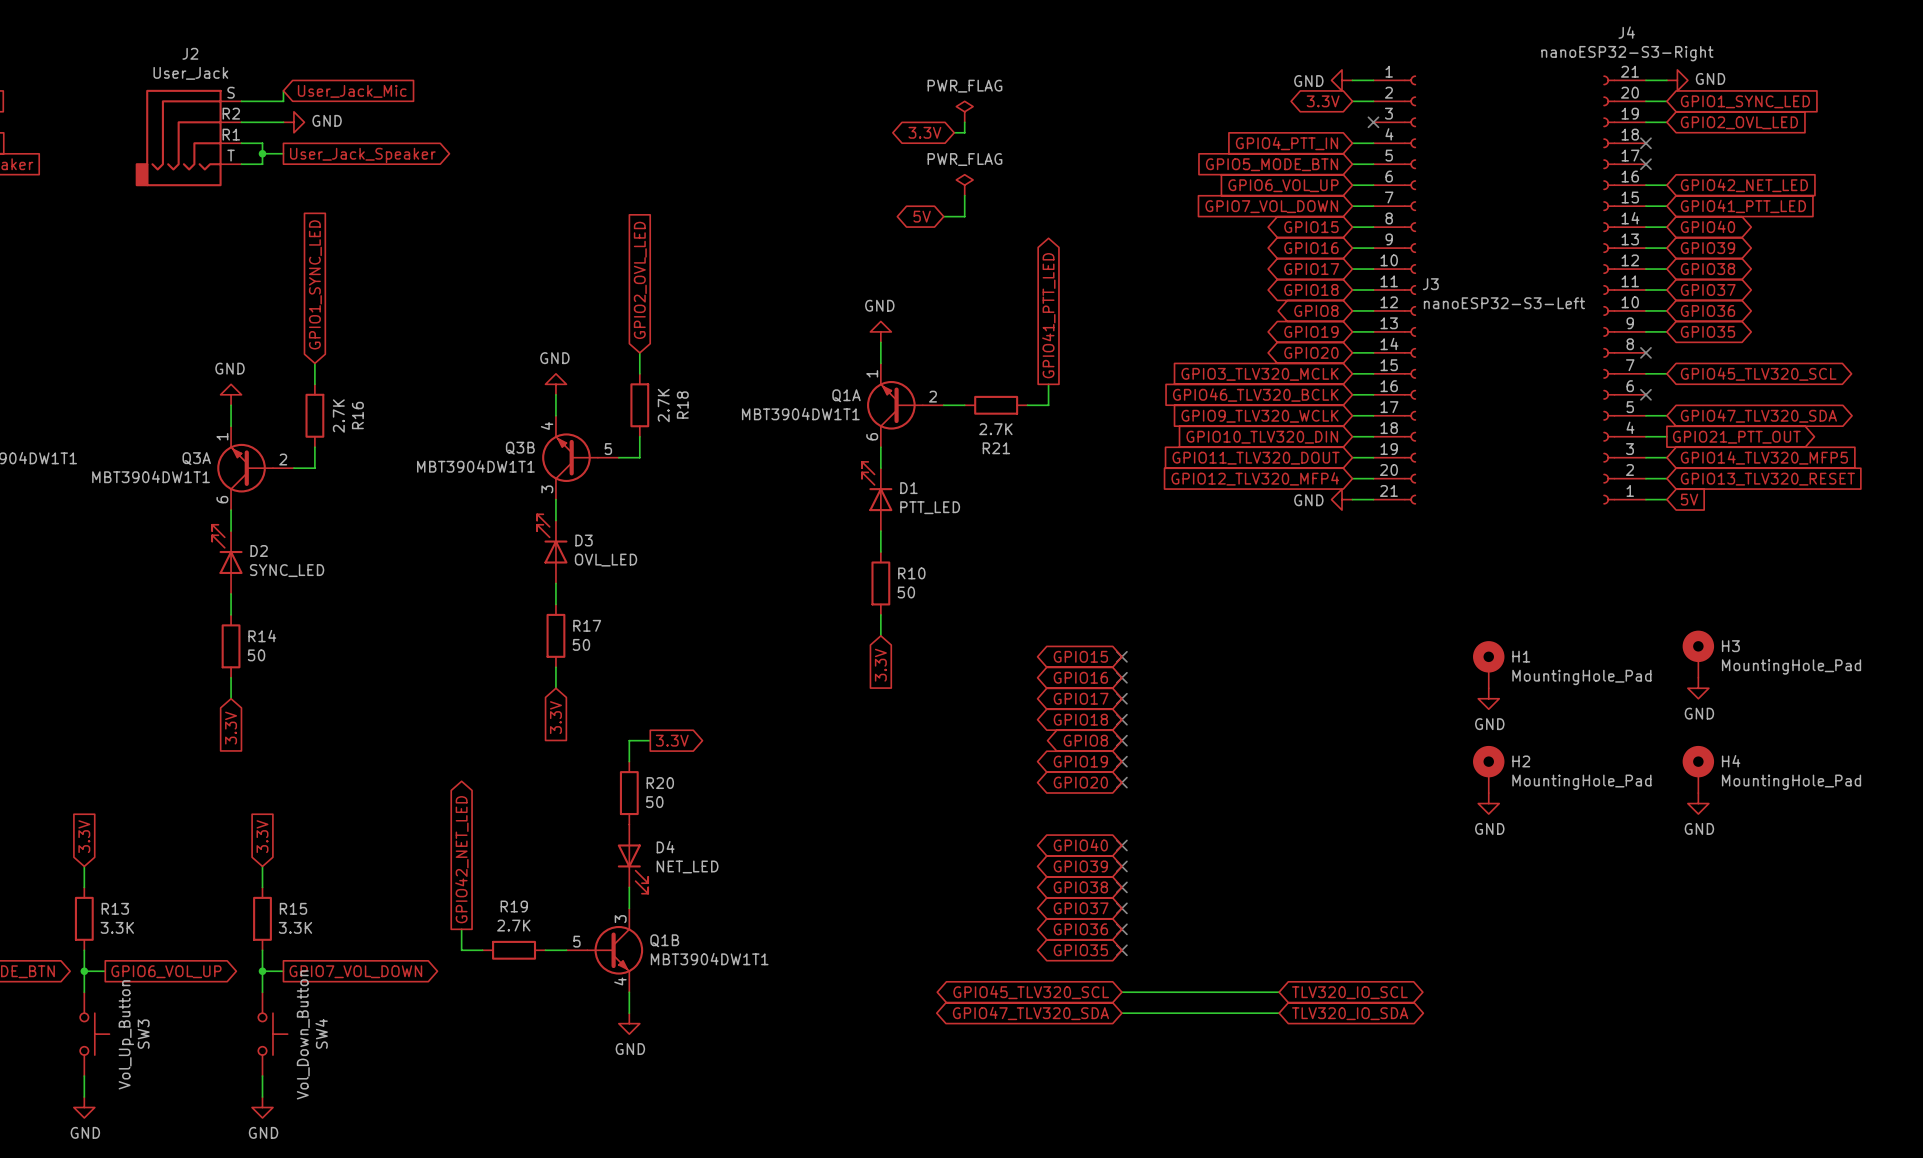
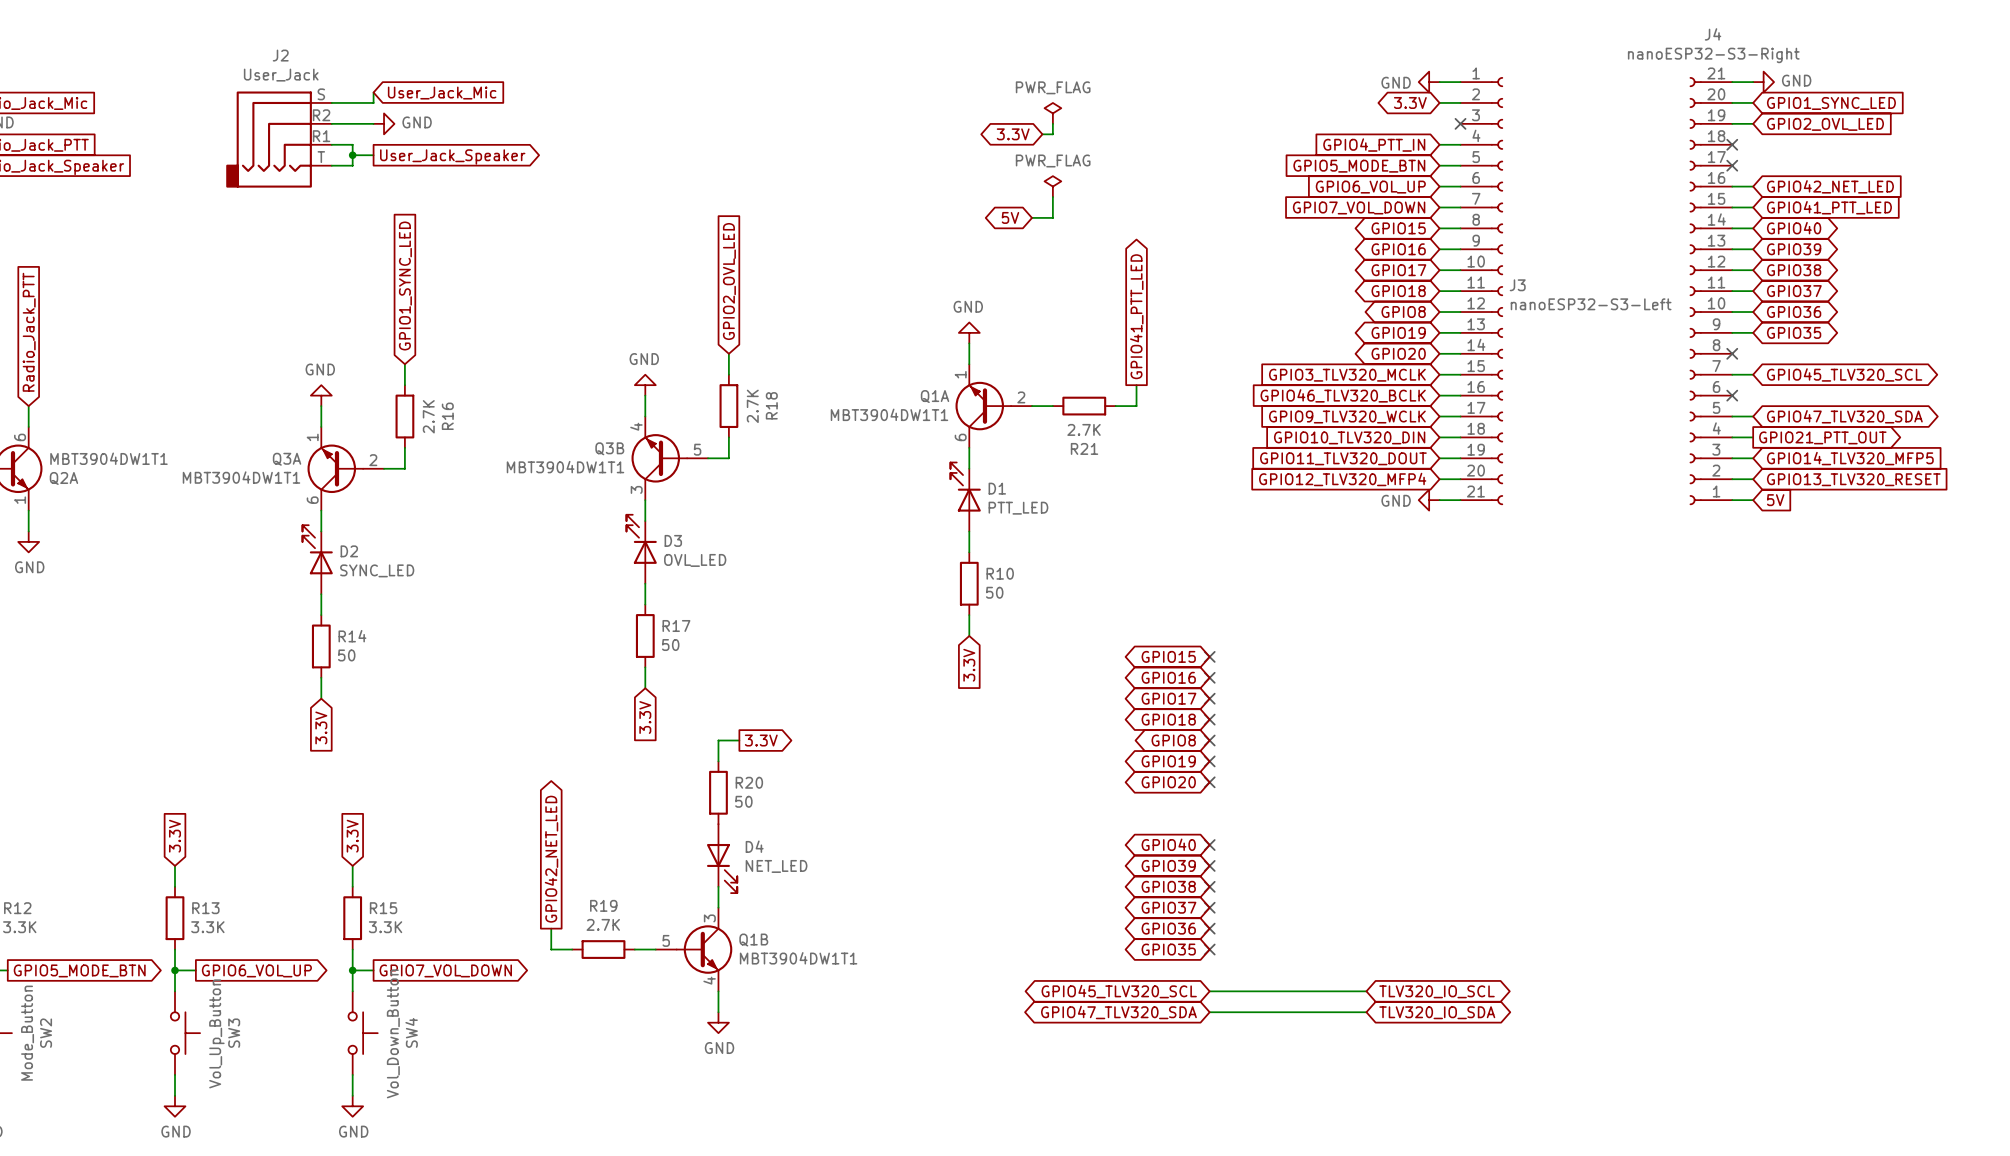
H3: MountingHole_Pad (1698, 654) -> none
H1: MountingHole_Pad (1488, 664) -> none
power symbol: GND (1698, 688) -> none
power symbol: GND (1488, 698) -> none
H2: MountingHole_Pad (1488, 769) -> none
H4: MountingHole_Pad (1698, 769) -> none
power symbol: GND (1488, 803) -> none
power symbol: GND (1698, 803) -> none

